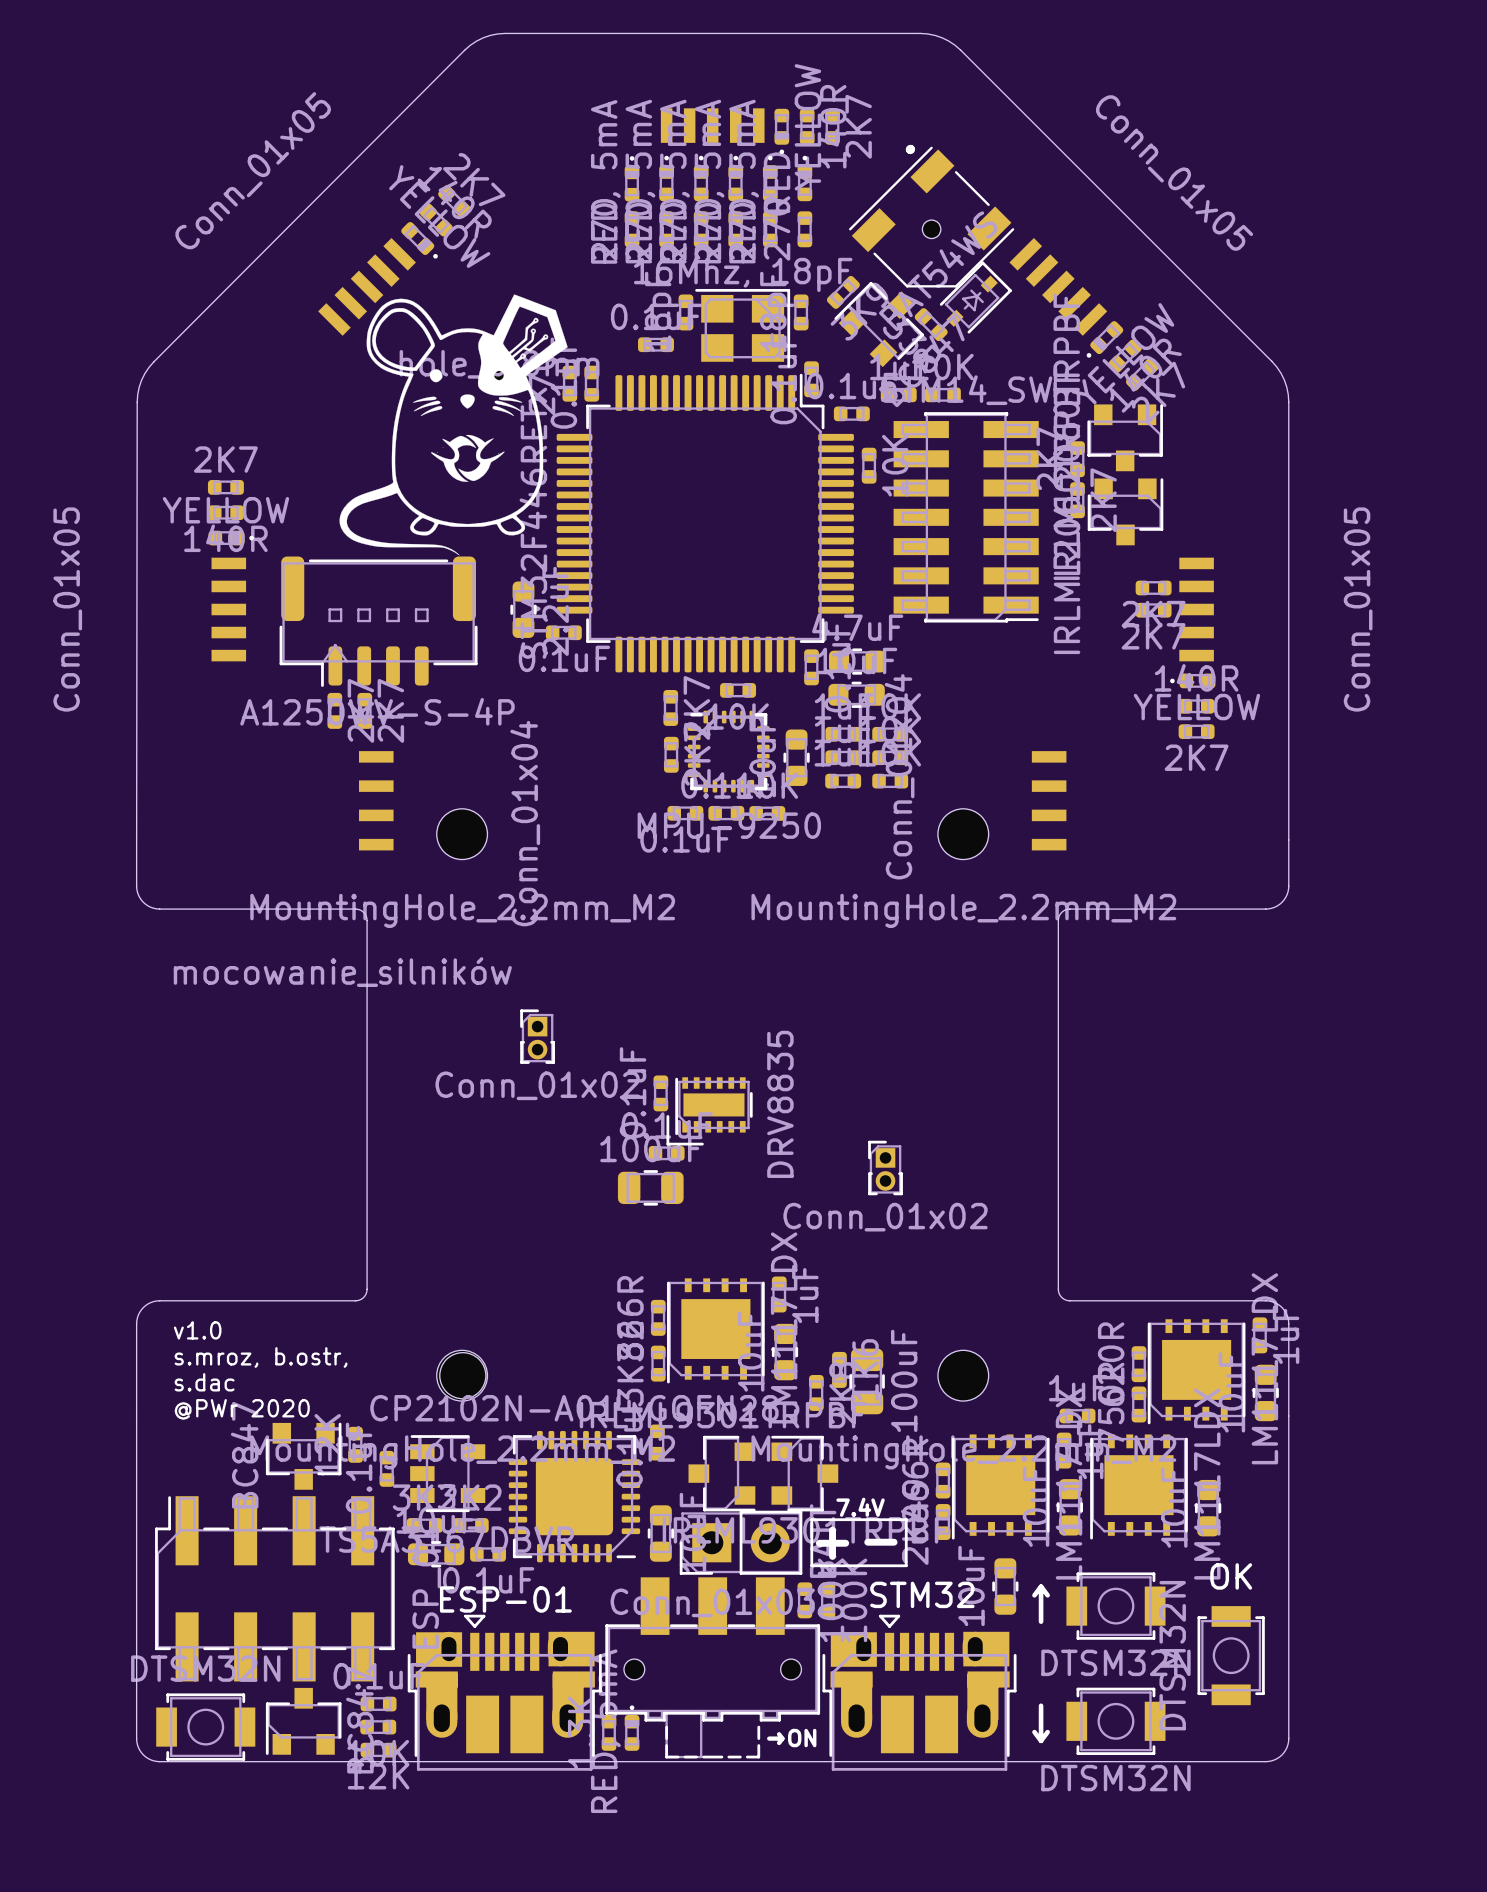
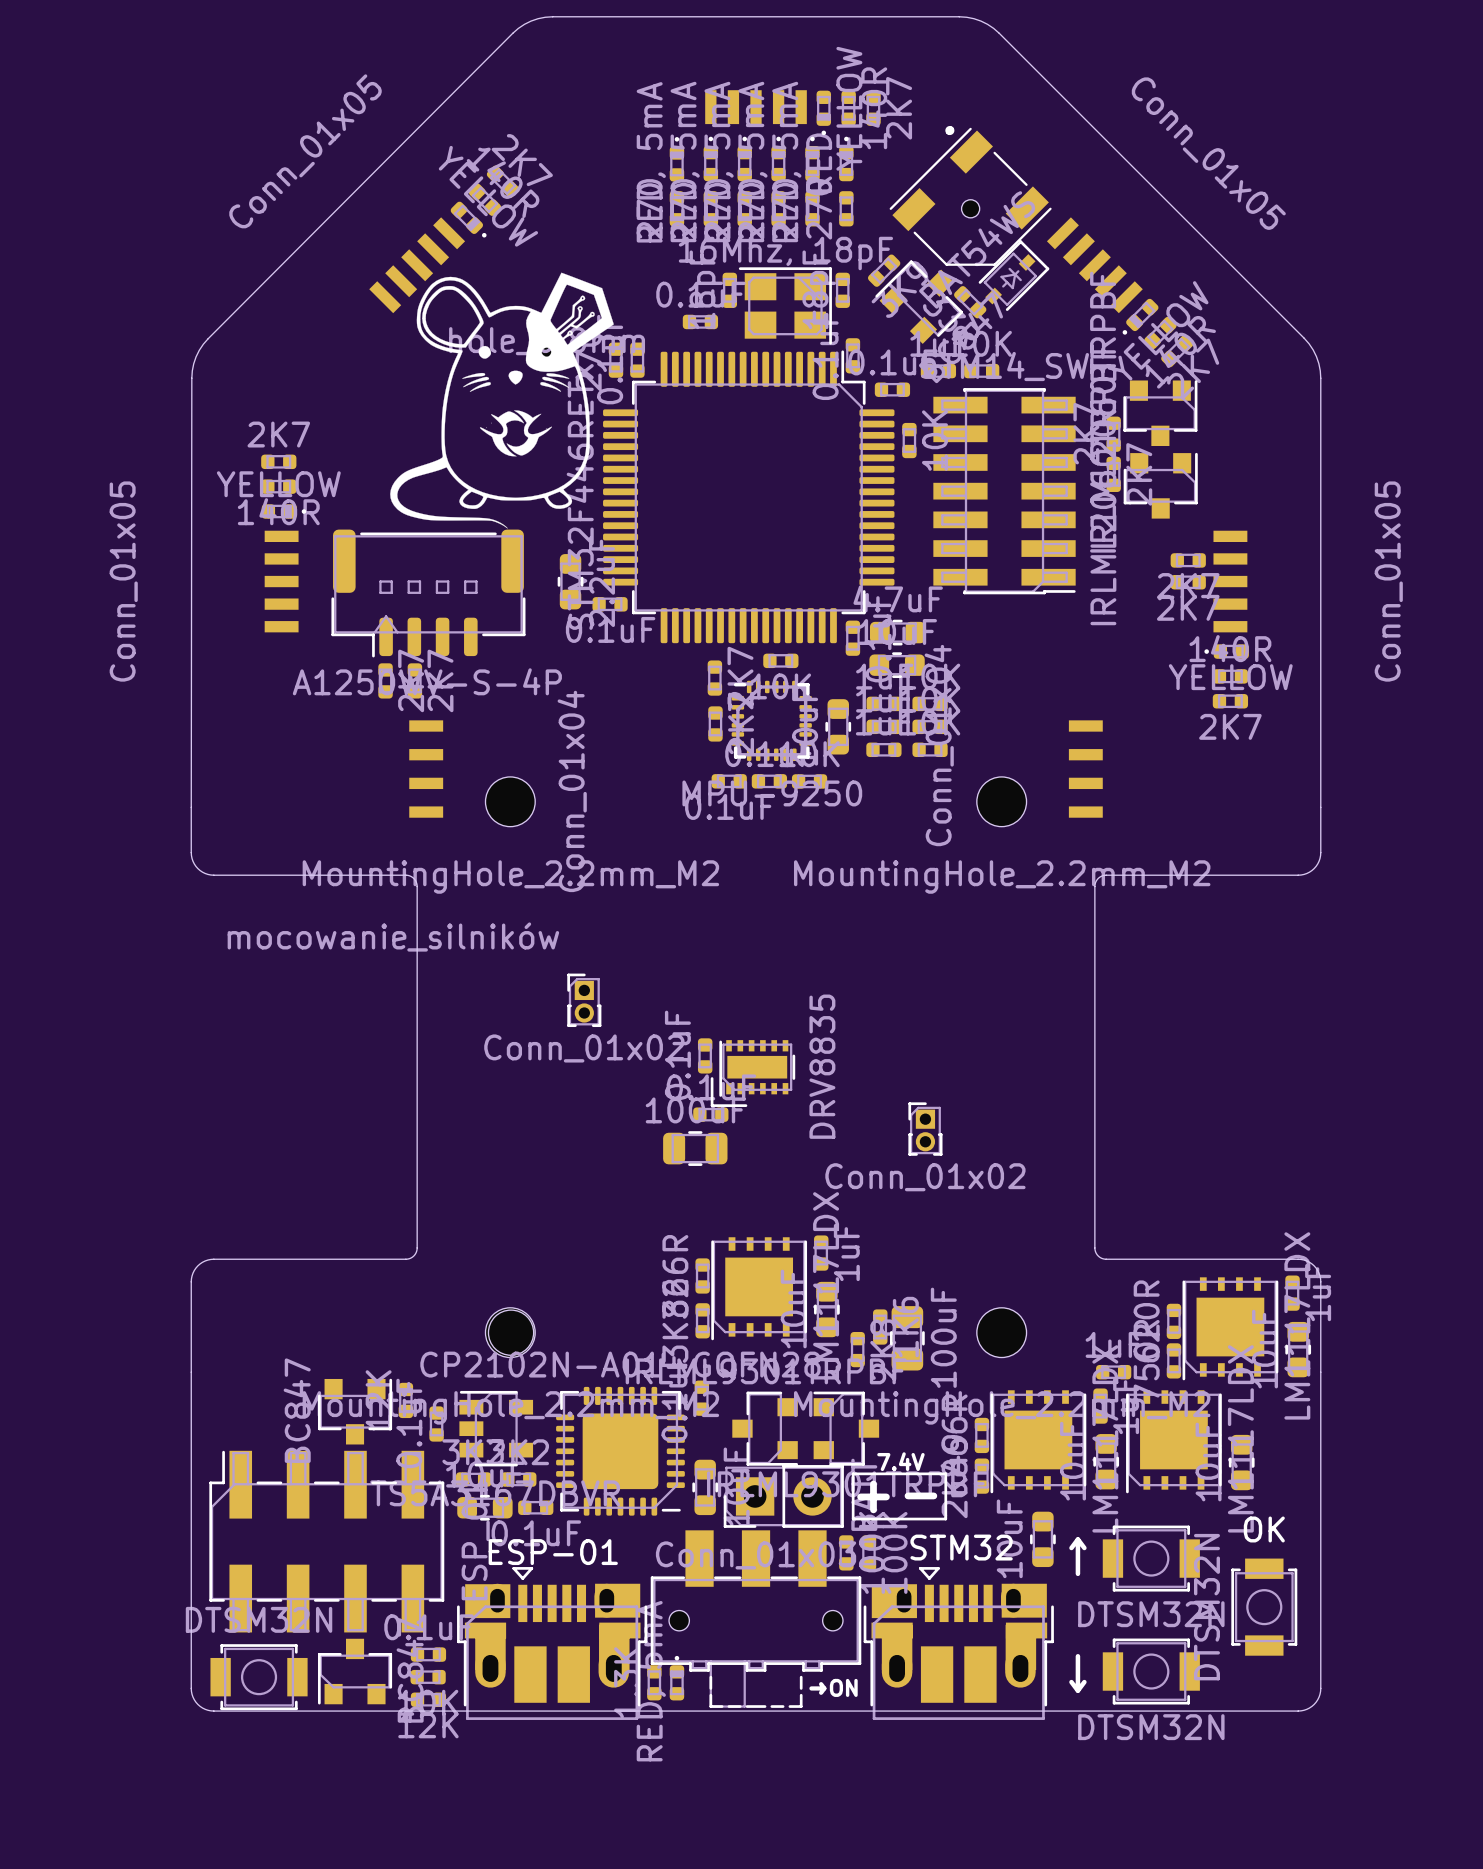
text: v1.0 (197, 1330) -> none
text: s.mroz, b.ostr, (261, 1357) -> none
text: s.dac (204, 1382) -> none
text: @PWr 2020 (242, 1409) -> none

